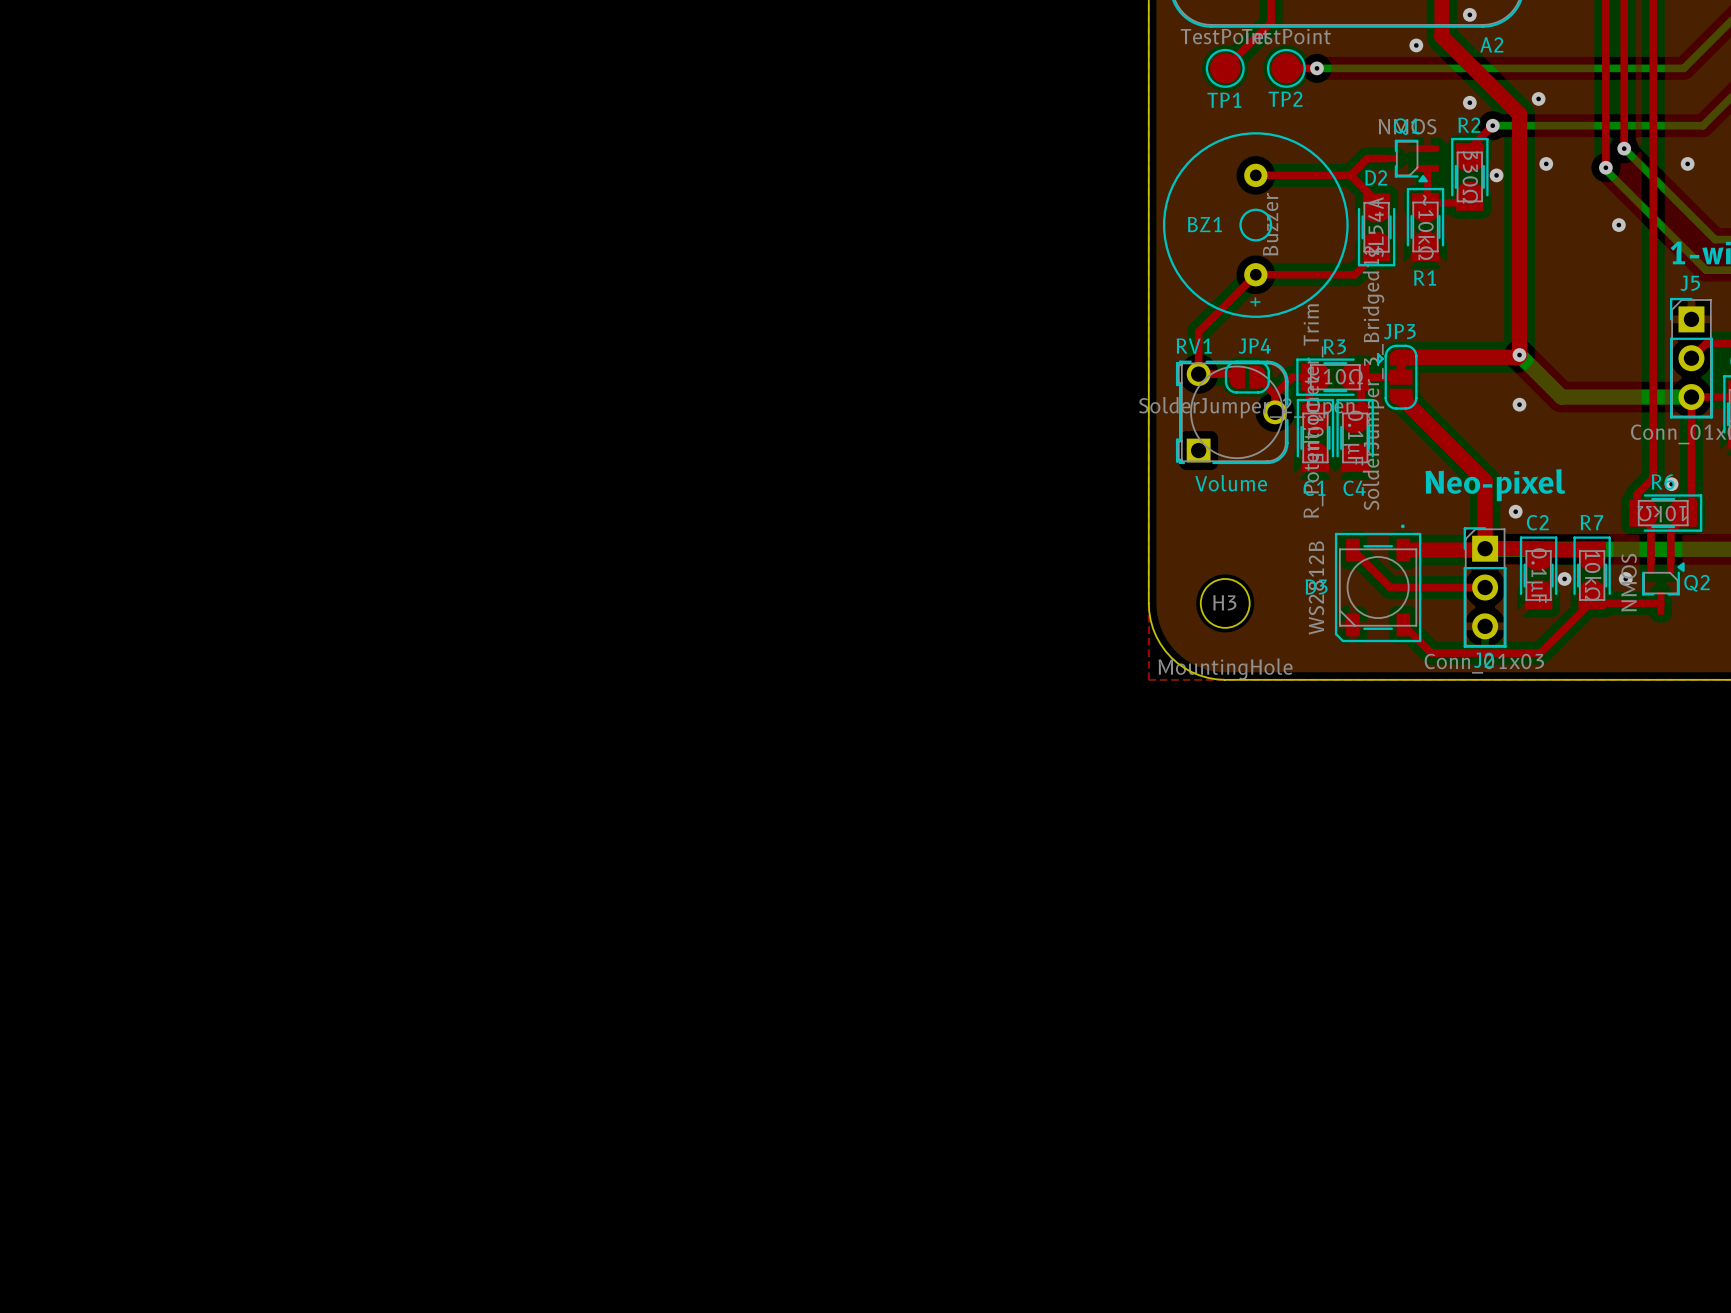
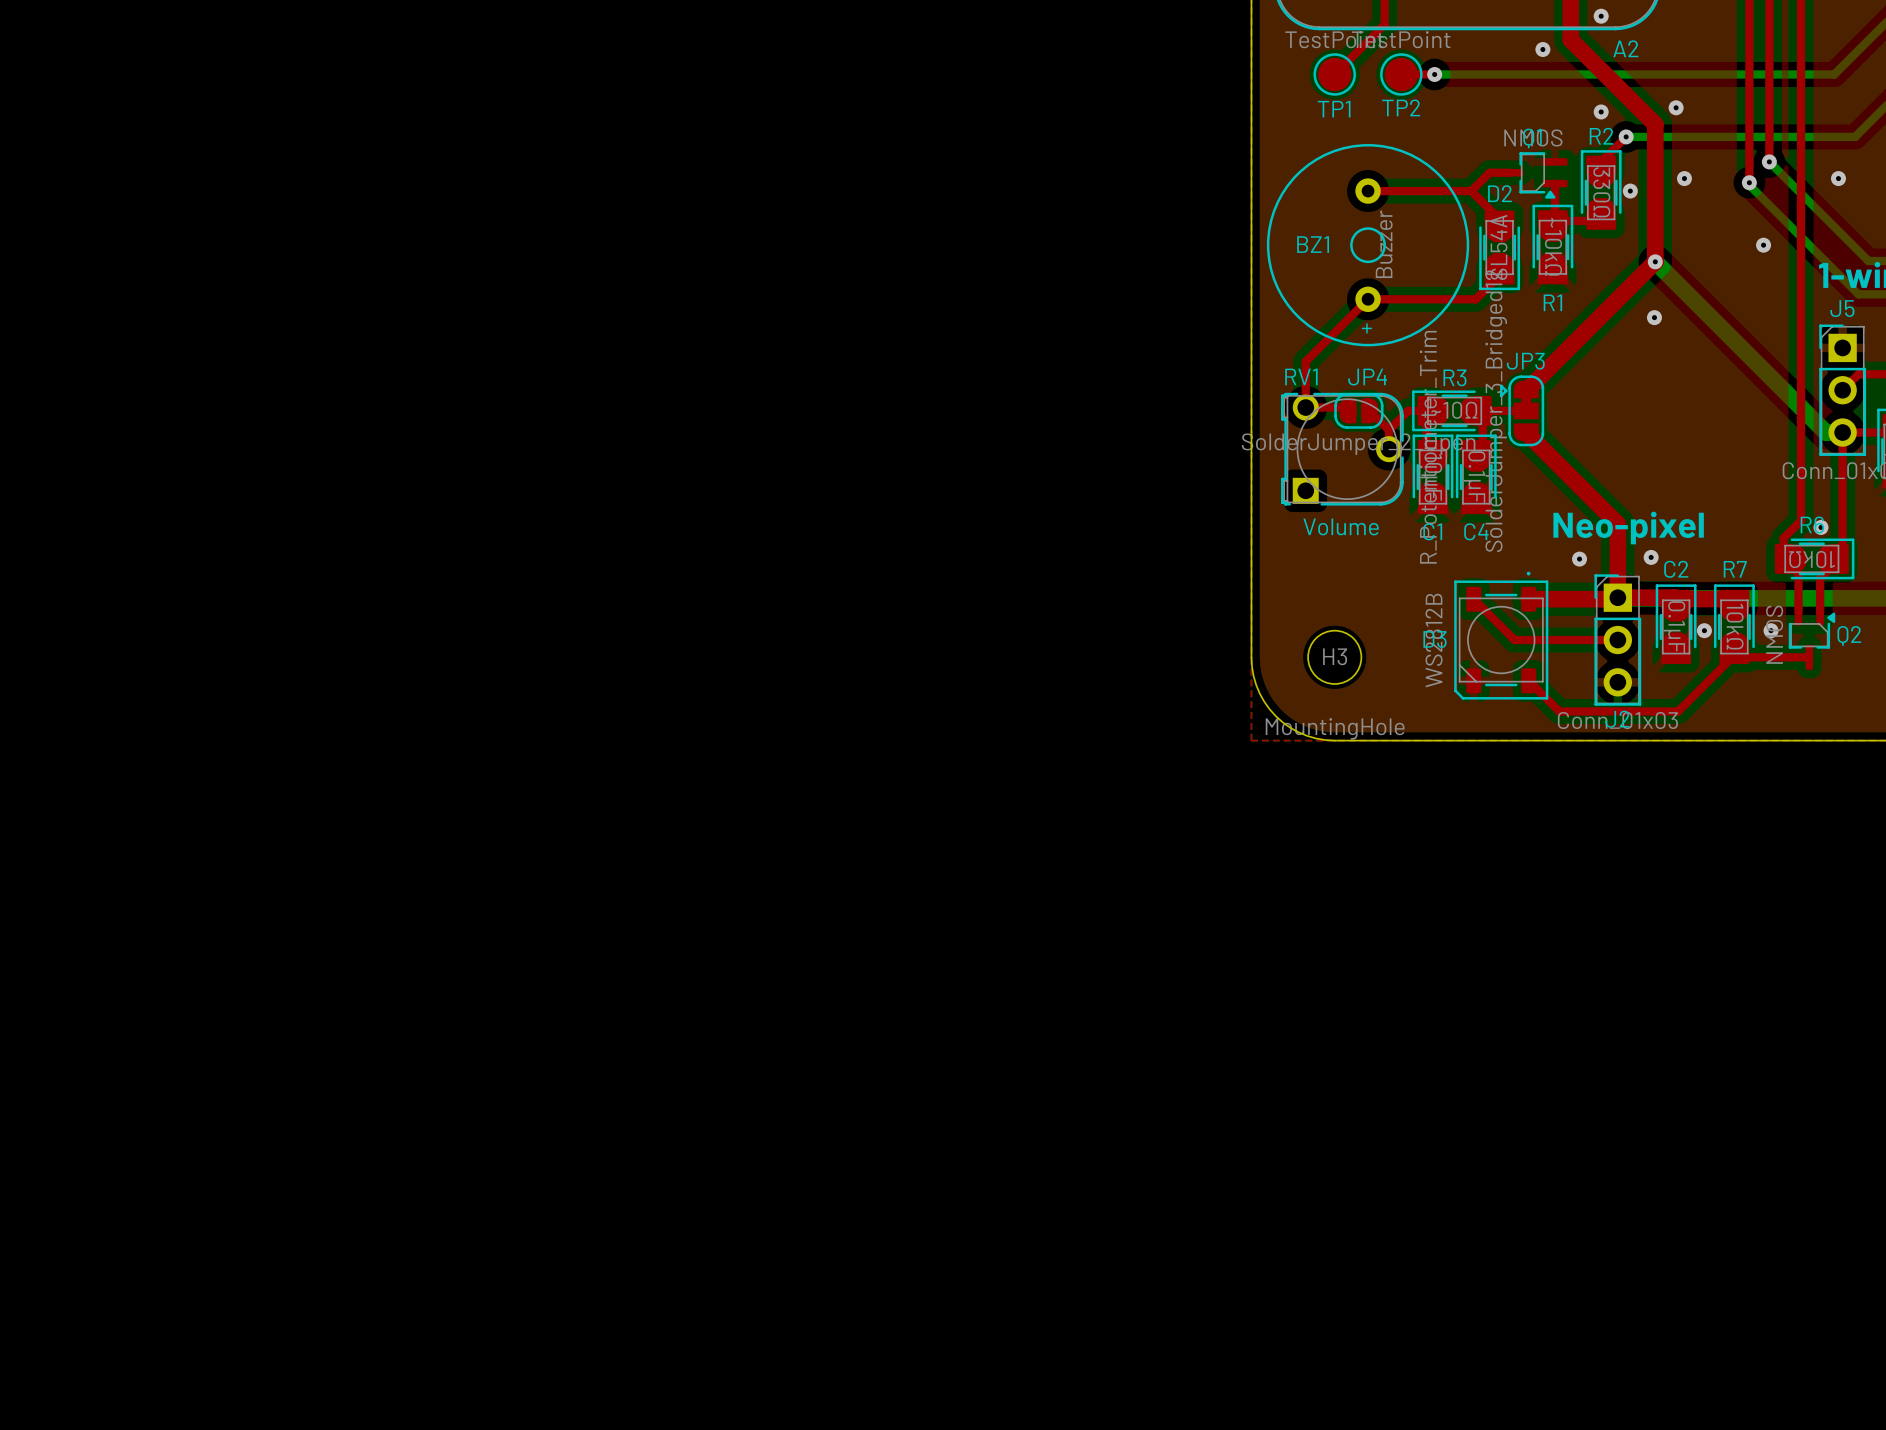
top track: (1519, 240) (1519, 355) (1517, 357) (1402, 357) -> (1655, 261) (1527, 389)
via: none -> (1655, 261)
via: none -> (1654, 317)
bottom track: (1519, 355) (1561, 397) (1676, 397) -> (1655, 261) (1826, 432)
via: (1519, 355) -> none
via: (1519, 404) -> none
via: none -> (1579, 559)

